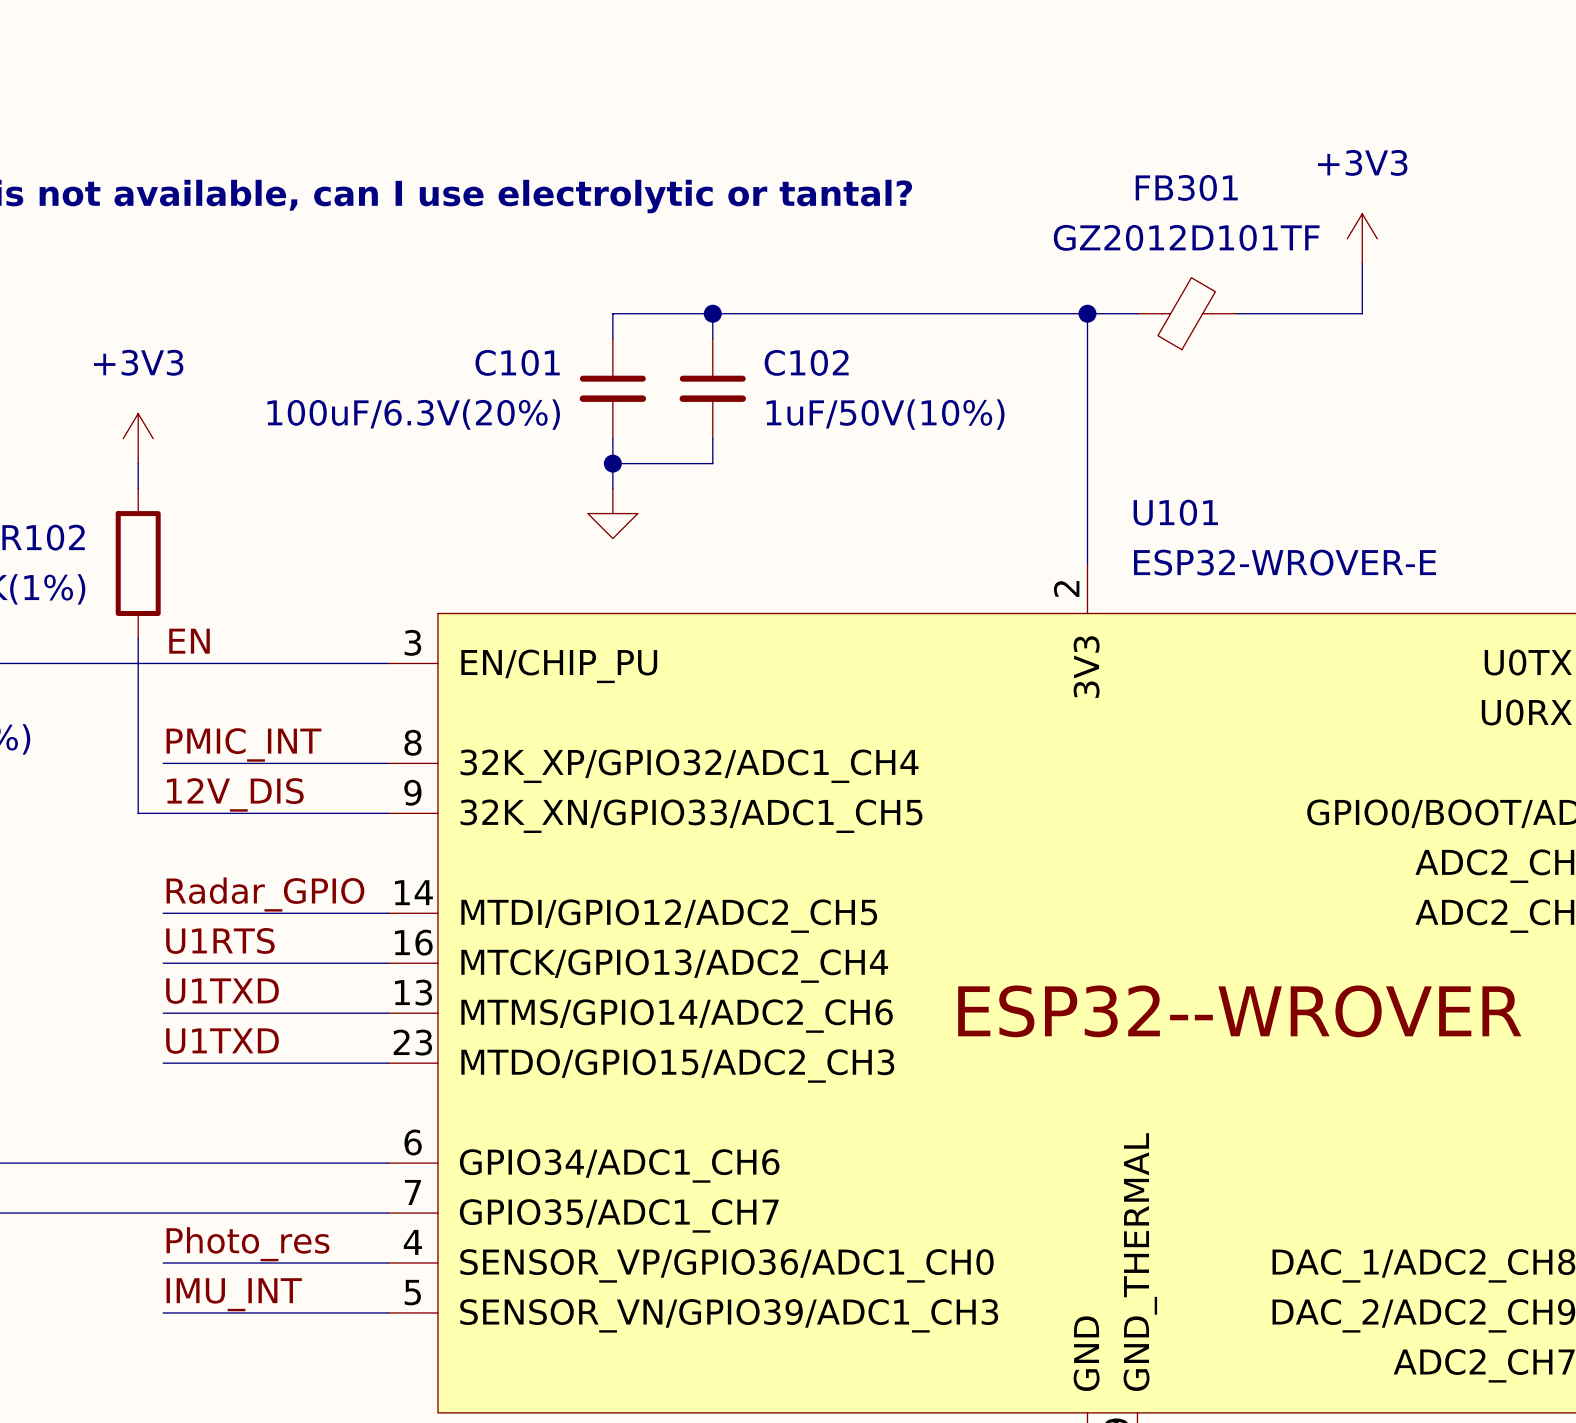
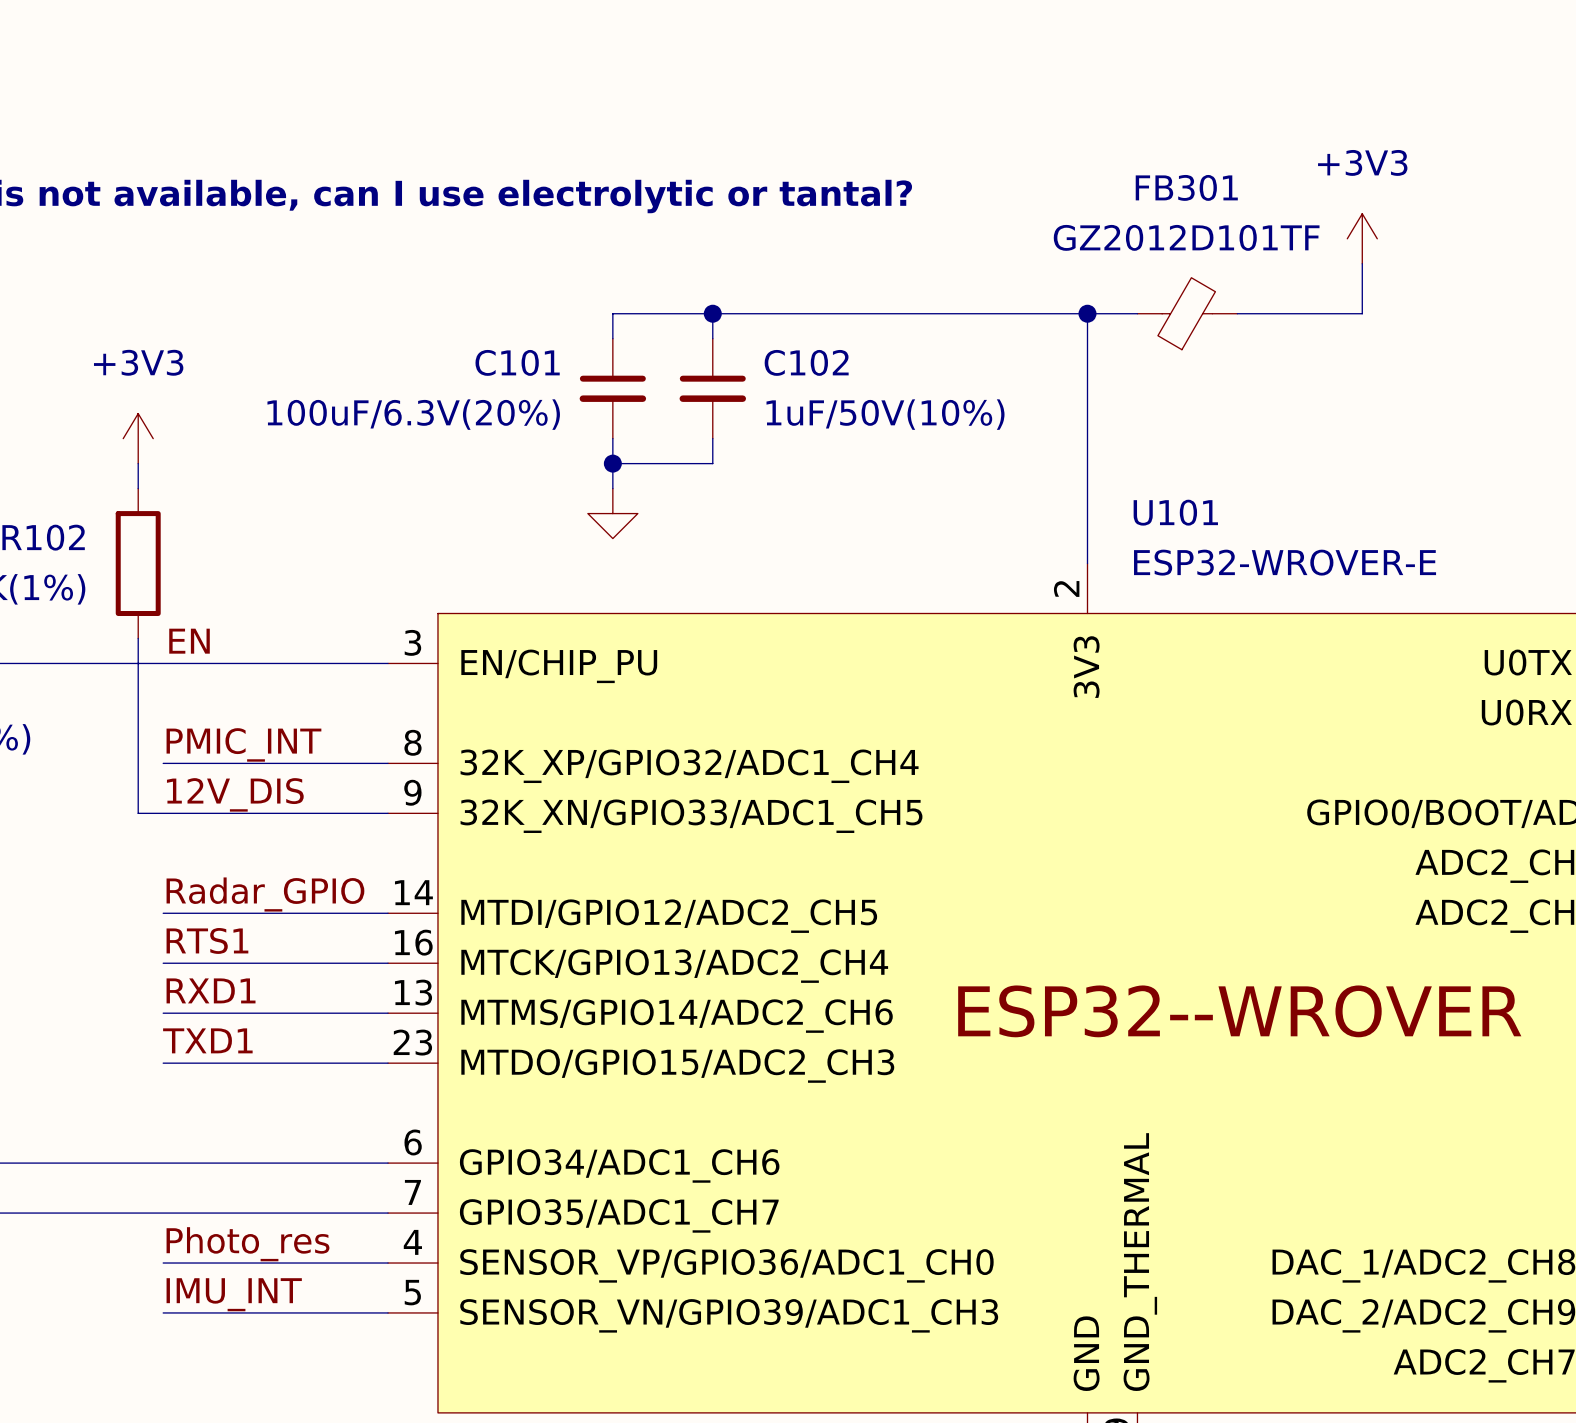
label: U1RTS (220, 940) -> RTS1 (207, 940)
label: U1TXD (222, 991) -> RXD1 (211, 990)
label: U1TXD (222, 1041) -> TXD1 (207, 1040)

